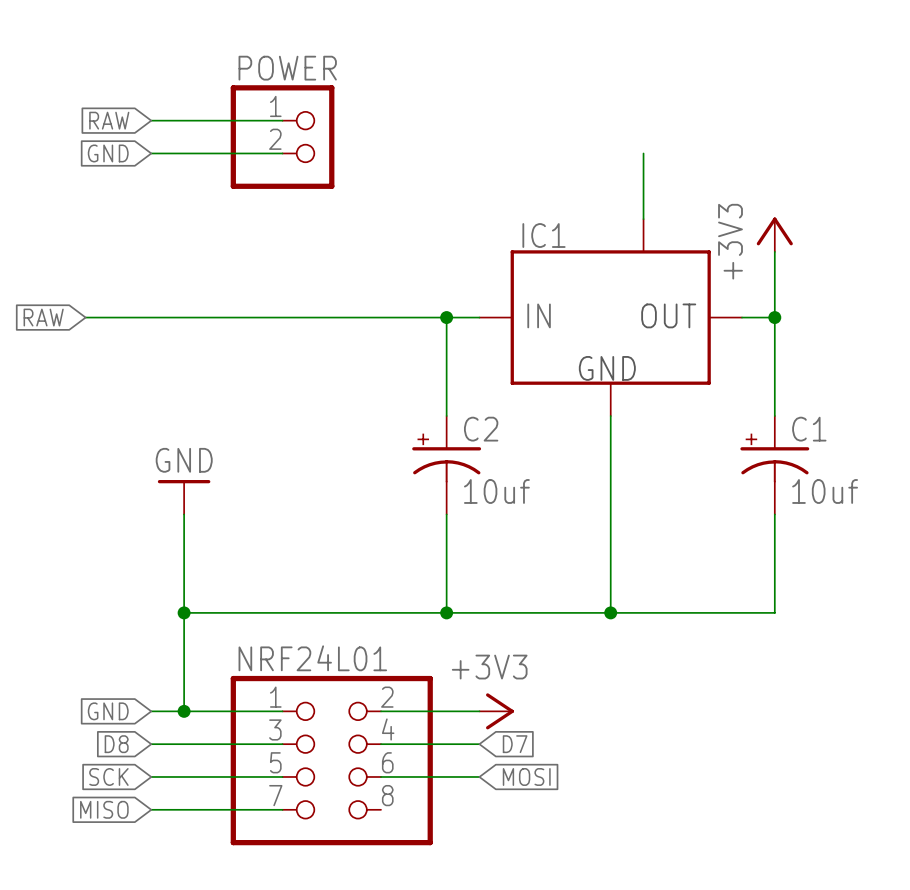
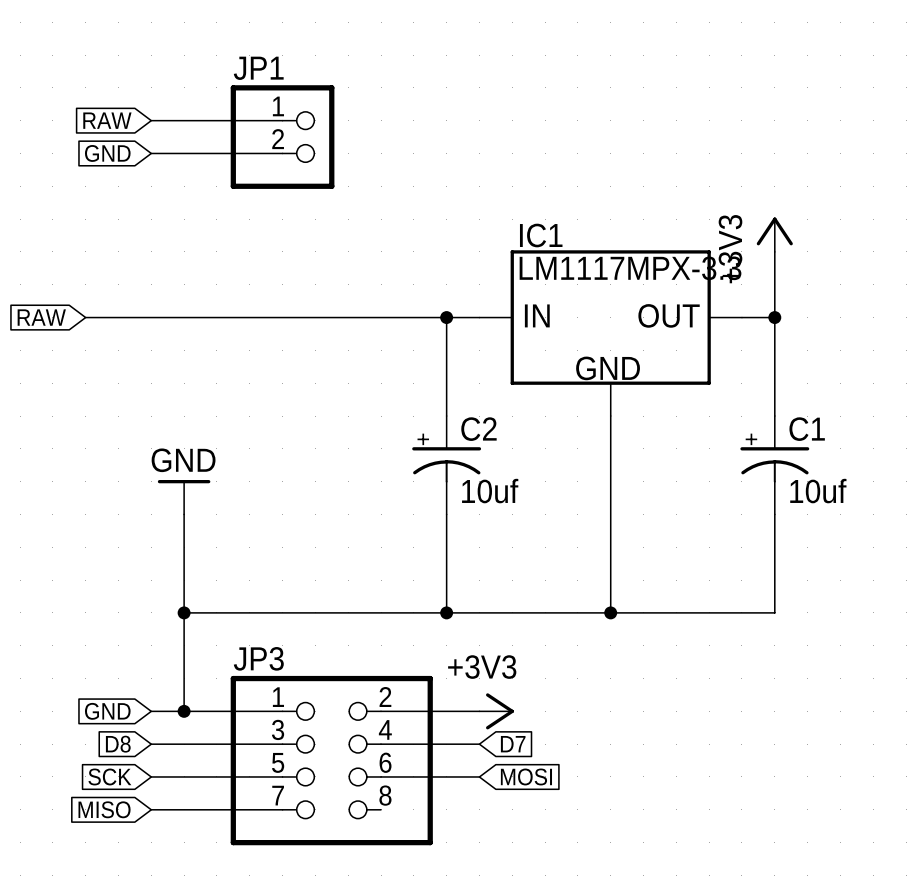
POWER name: POWER (287, 68) -> JP1 (258, 68)
wire: (643, 153) (643, 219) -> none
IC1 symbol: [479, 219, 742, 417] -> [479, 250, 742, 417]
IC1 value: none -> LM1117MPX-3.3 (630, 268)
NRF24L01 name: NRF24L01 (312, 658) -> JP3 (258, 658)

